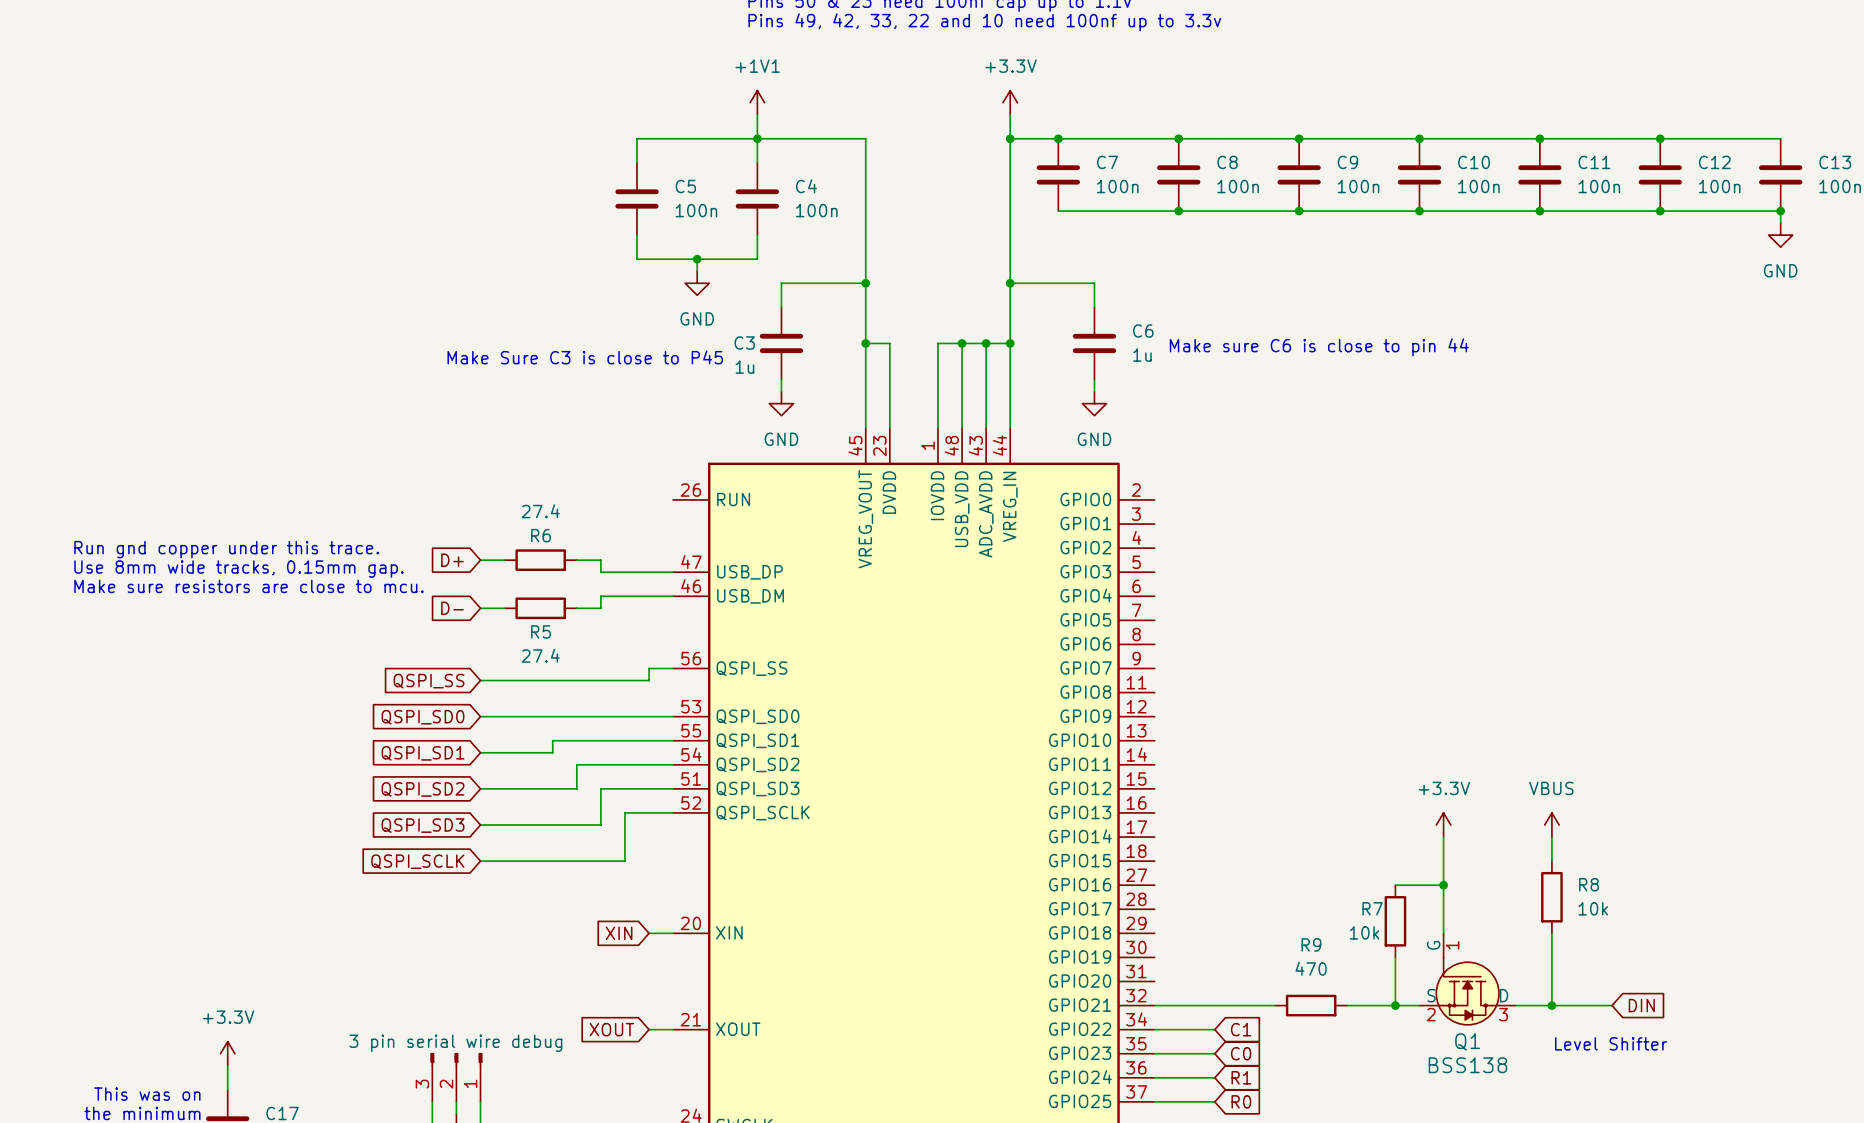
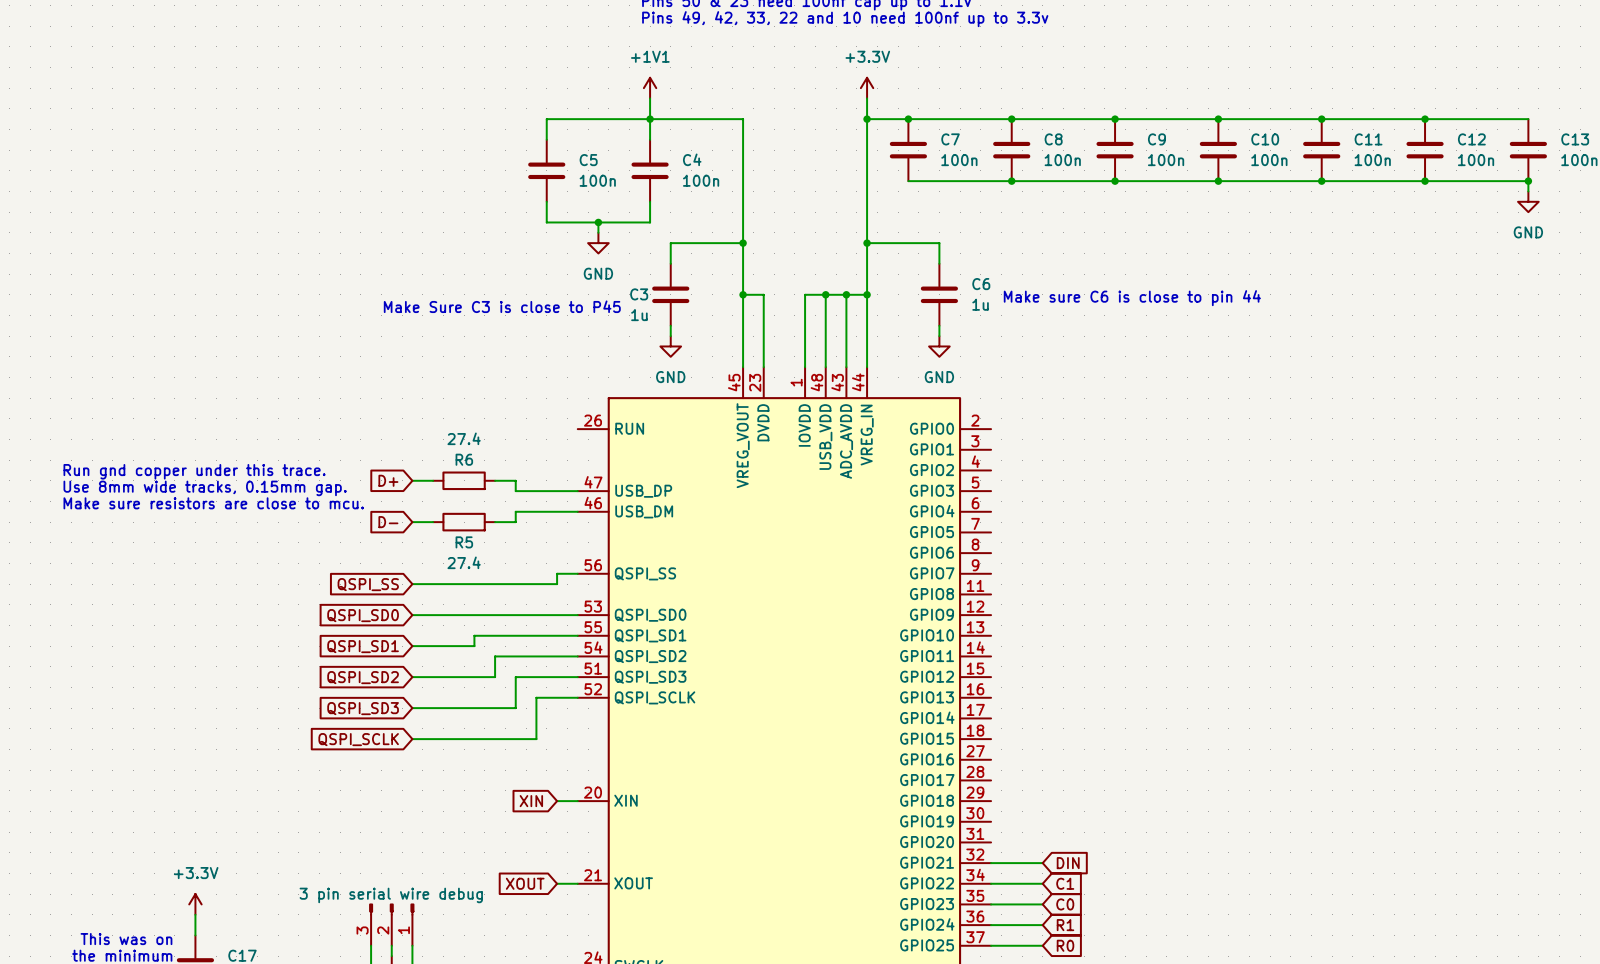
power symbol: +3.3V (1443, 825) -> none
power symbol: VBUS (1551, 825) -> none
wire: (1443, 837) (1443, 933) -> none
wire: (1551, 837) (1551, 861) -> none
wire: (1395, 885) (1443, 885) -> none
junction: (1443, 885) -> none
R8: 10k (1551, 897) -> none
R7: 10k (1395, 921) -> none
wire: (1551, 933) (1551, 1005) -> none
wire: (1395, 957) (1395, 1005) -> none
Q1: BSS138 (1467, 979) -> none
wire: (1214, 1005) (1275, 1005) -> none
global label: none -> DIN (1068, 863)
R9: 470 (1311, 1005) -> none
wire: (1347, 1005) (1419, 1005) -> none
junction: (1395, 1005) -> none
wire: (1515, 1005) (1612, 1005) -> none
junction: (1551, 1005) -> none
global label: DIN (1641, 1005) -> none
text: Level Shifter (1611, 1043) -> none

